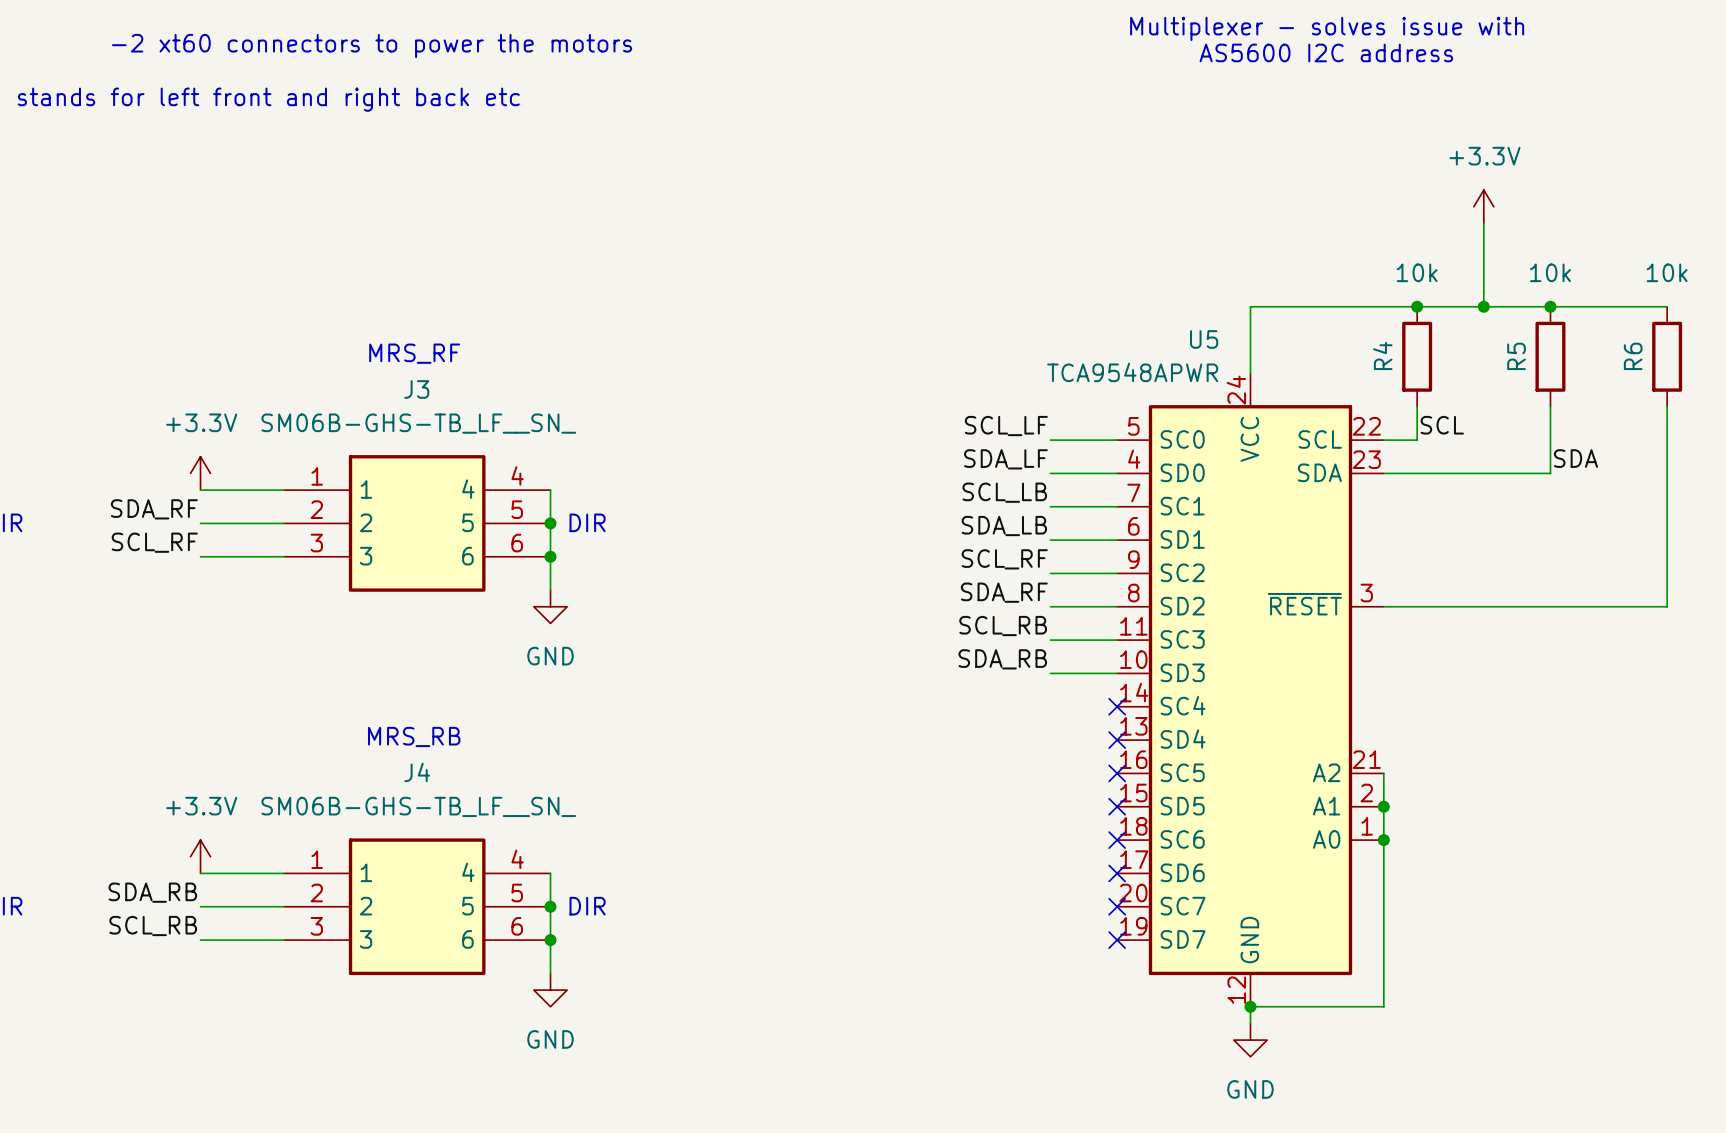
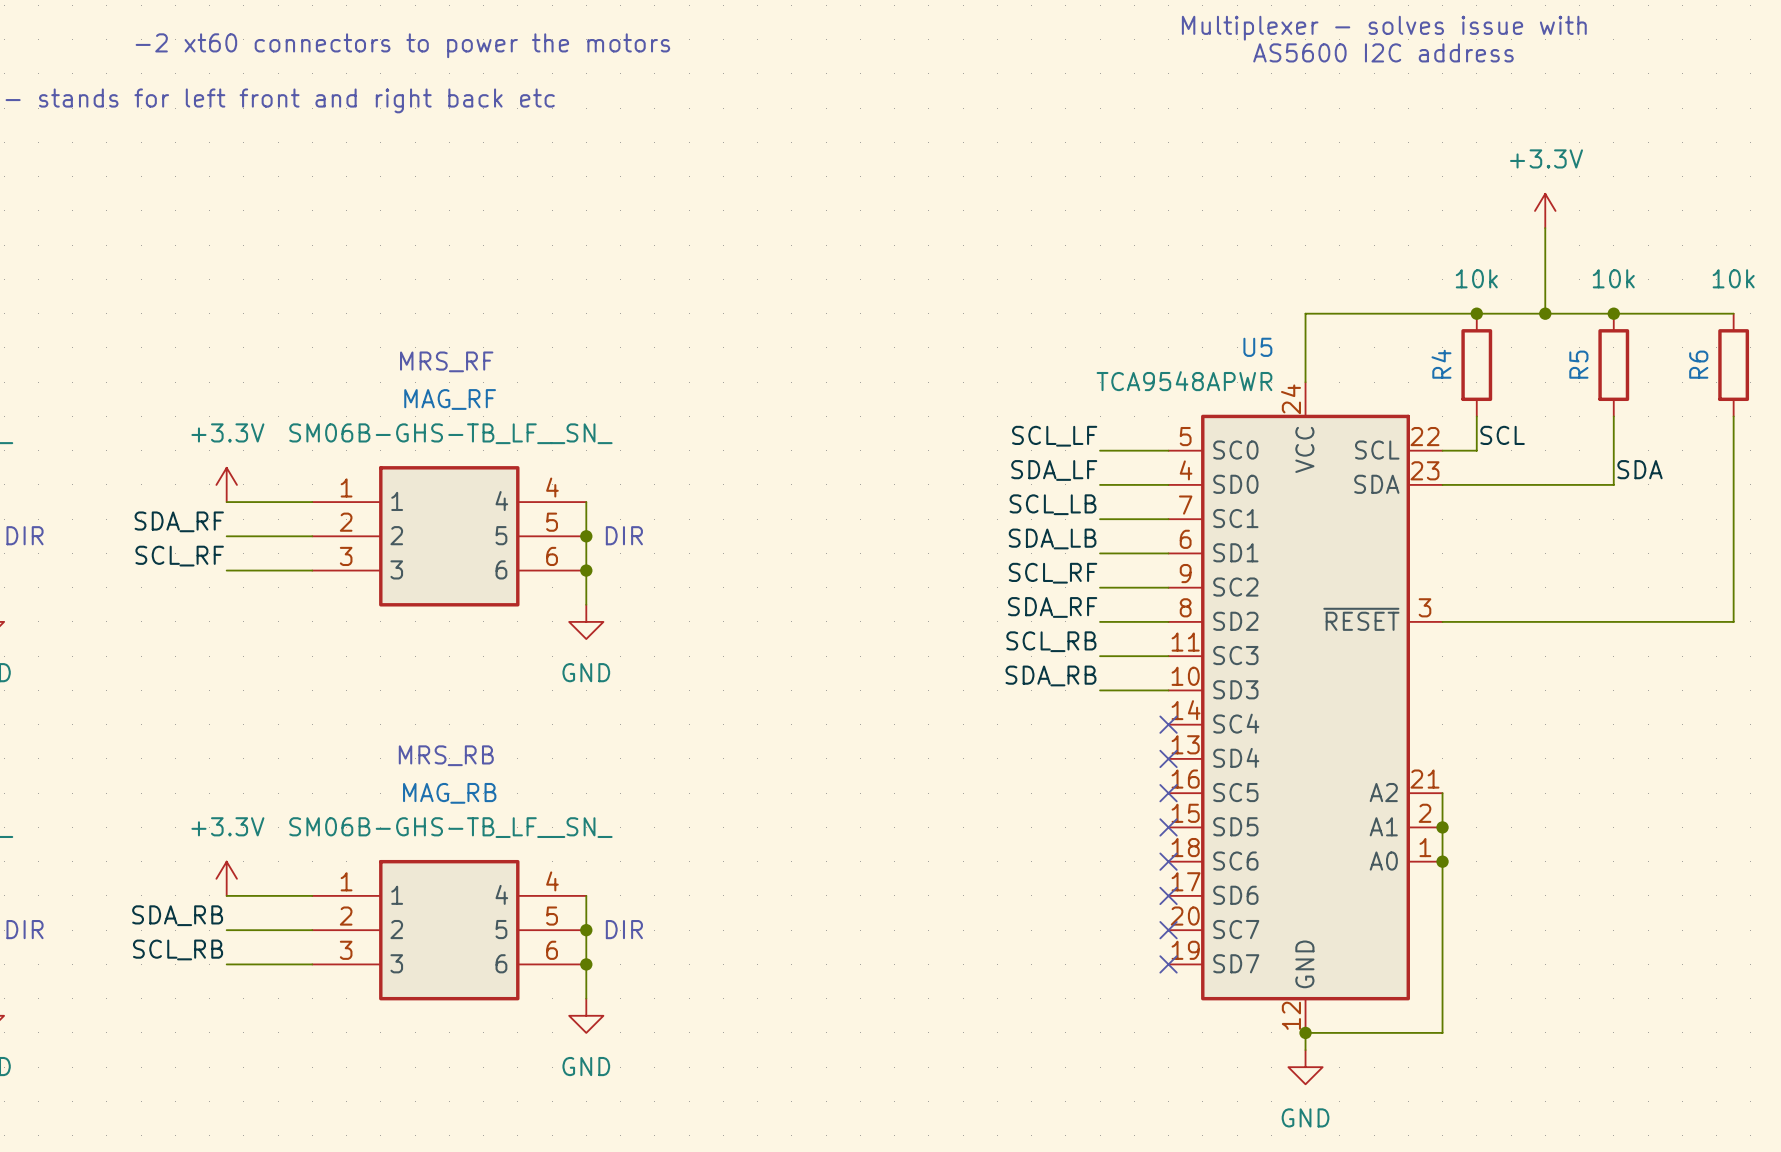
J3 name: J3 (416, 389) -> MAG_RF (450, 399)
J4 name: J4 (417, 772) -> MAG_RB (449, 793)

